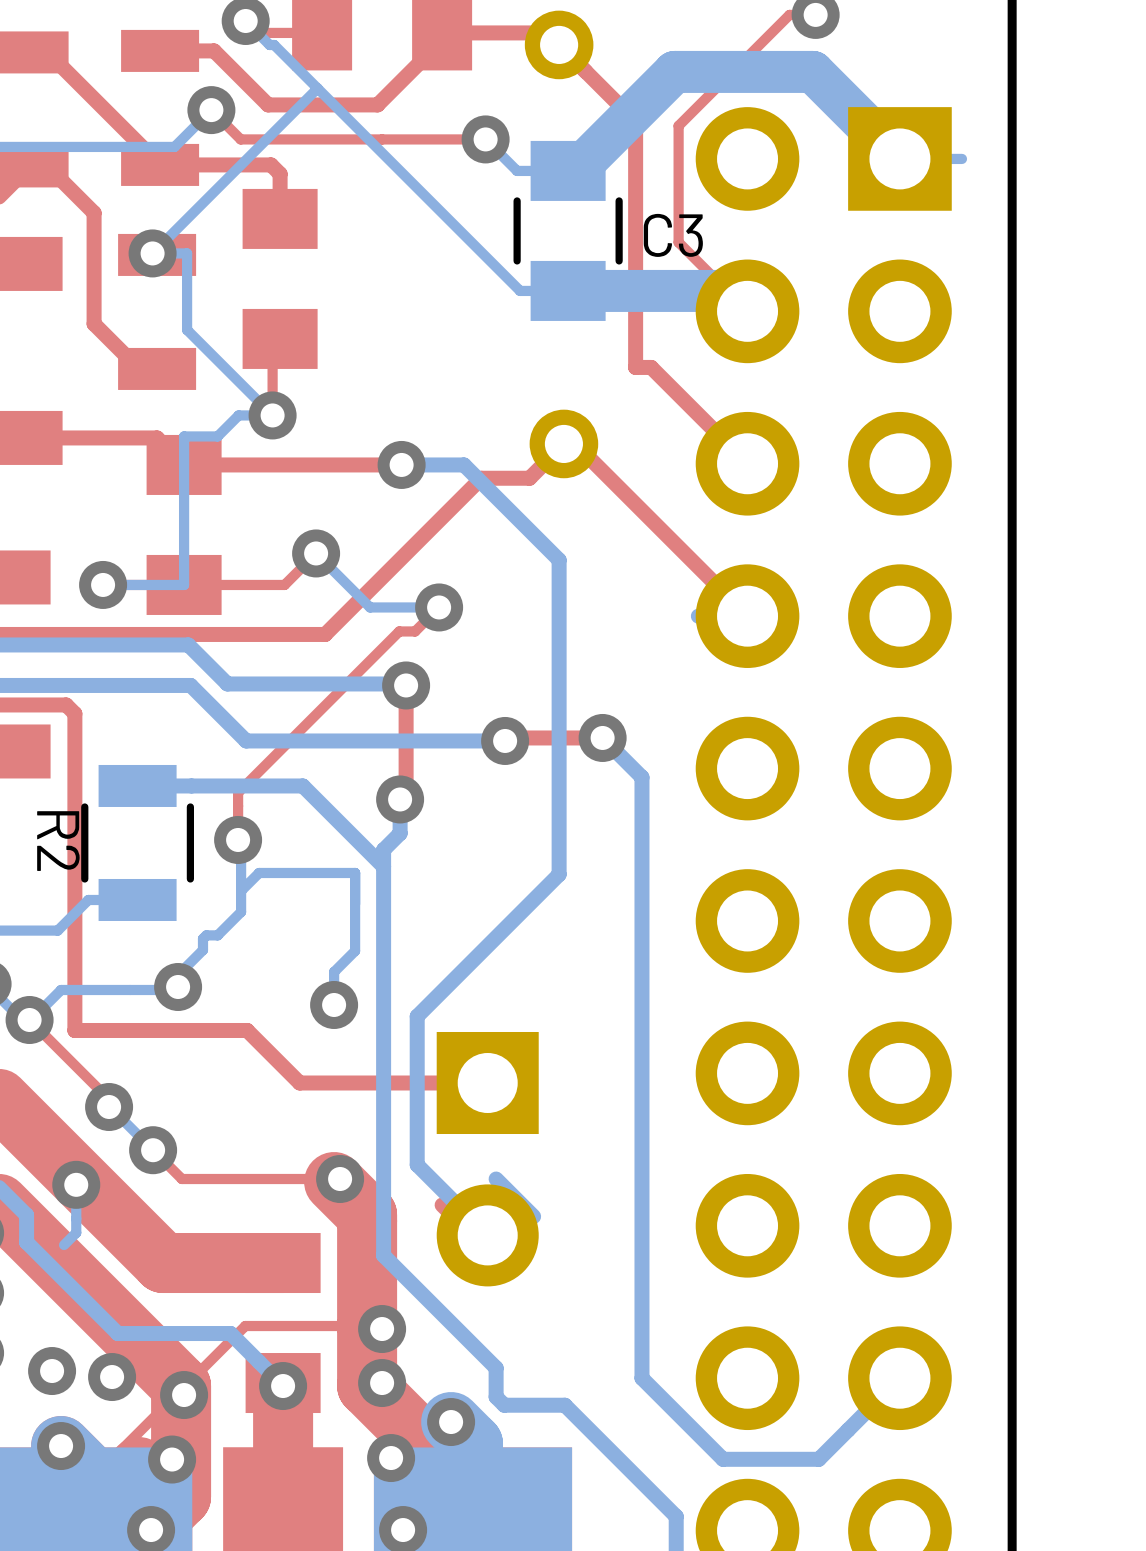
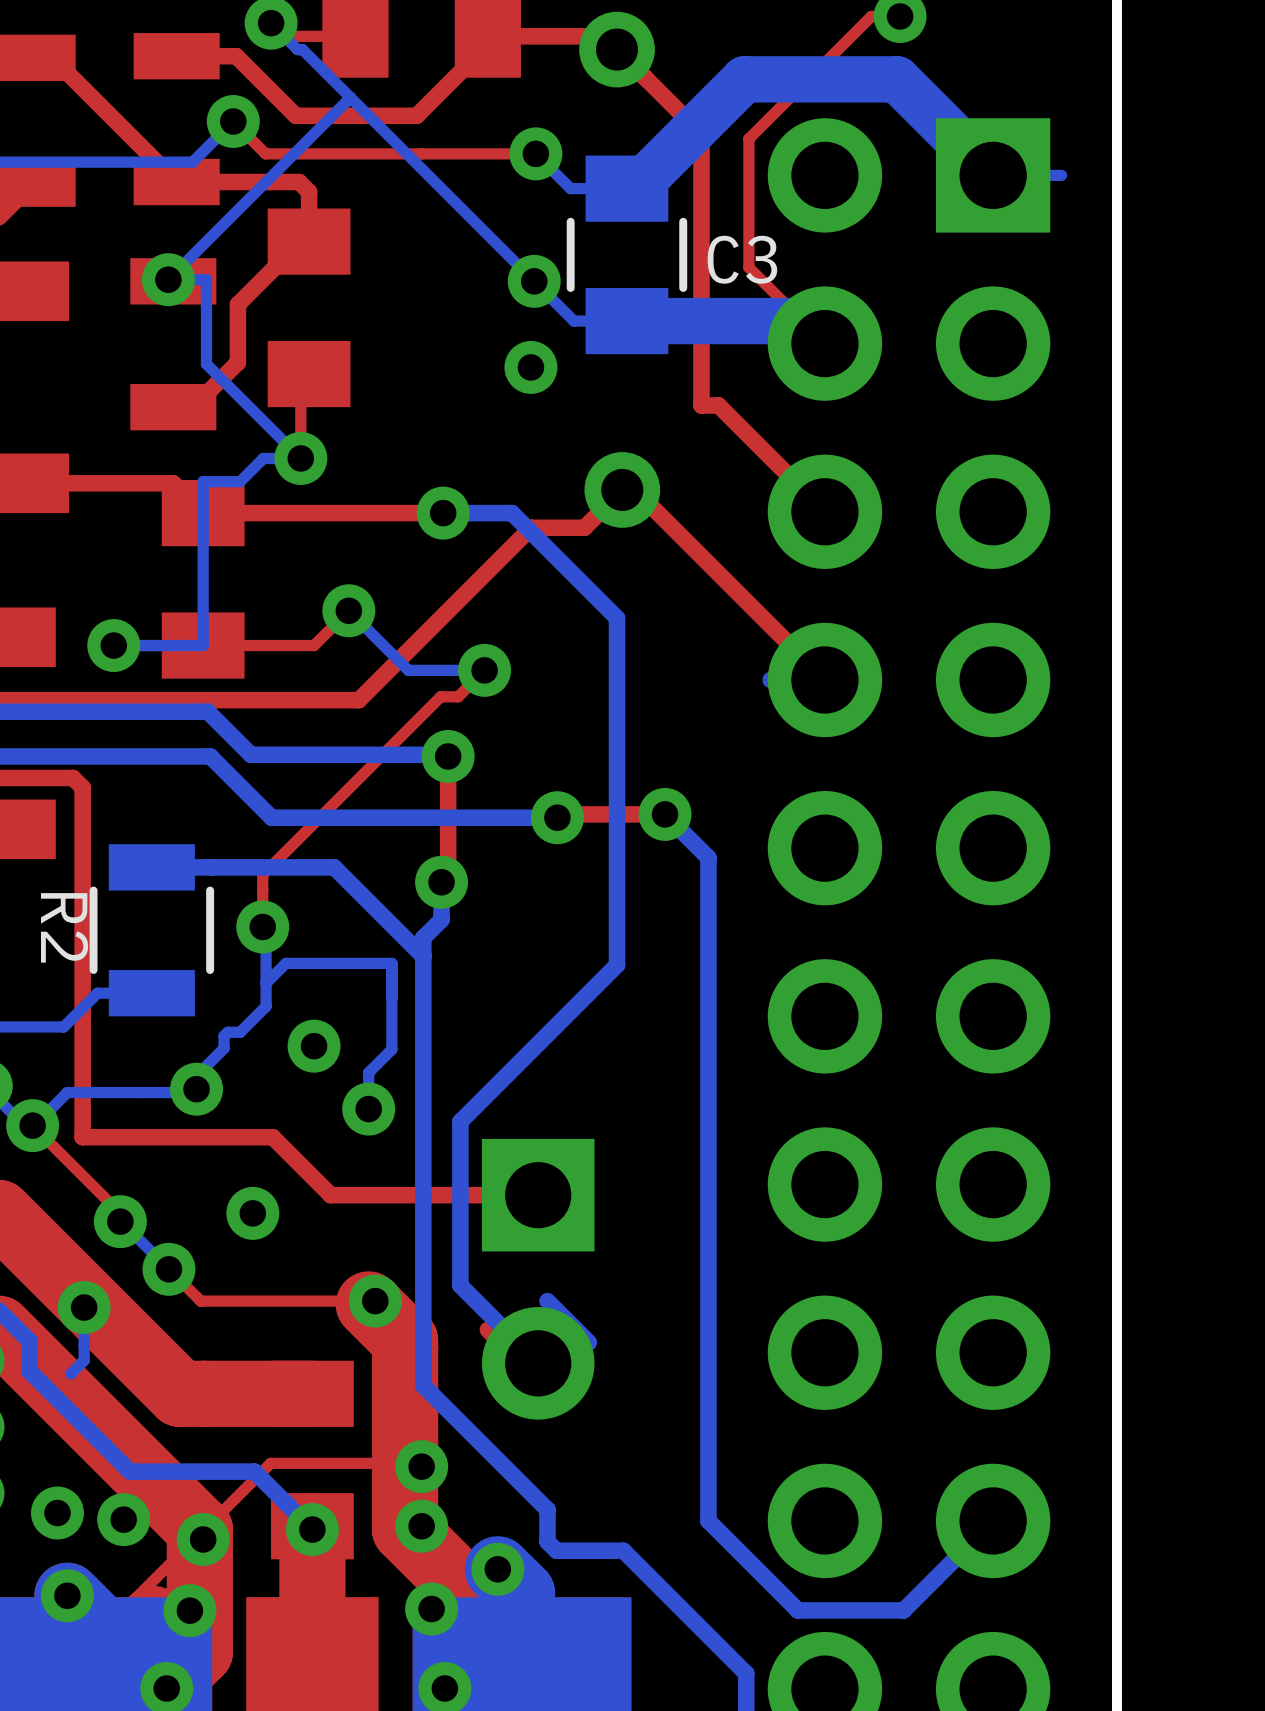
top track: (47, 166) (94, 212) (94, 323) (139, 368) -> none
top track: none -> (309, 241) (300, 241) (237, 304) (237, 362) (193, 407) (173, 407)
via: none -> (534, 281)
via: none -> (530, 367)
via: none -> (314, 1046)
via: none -> (252, 1213)

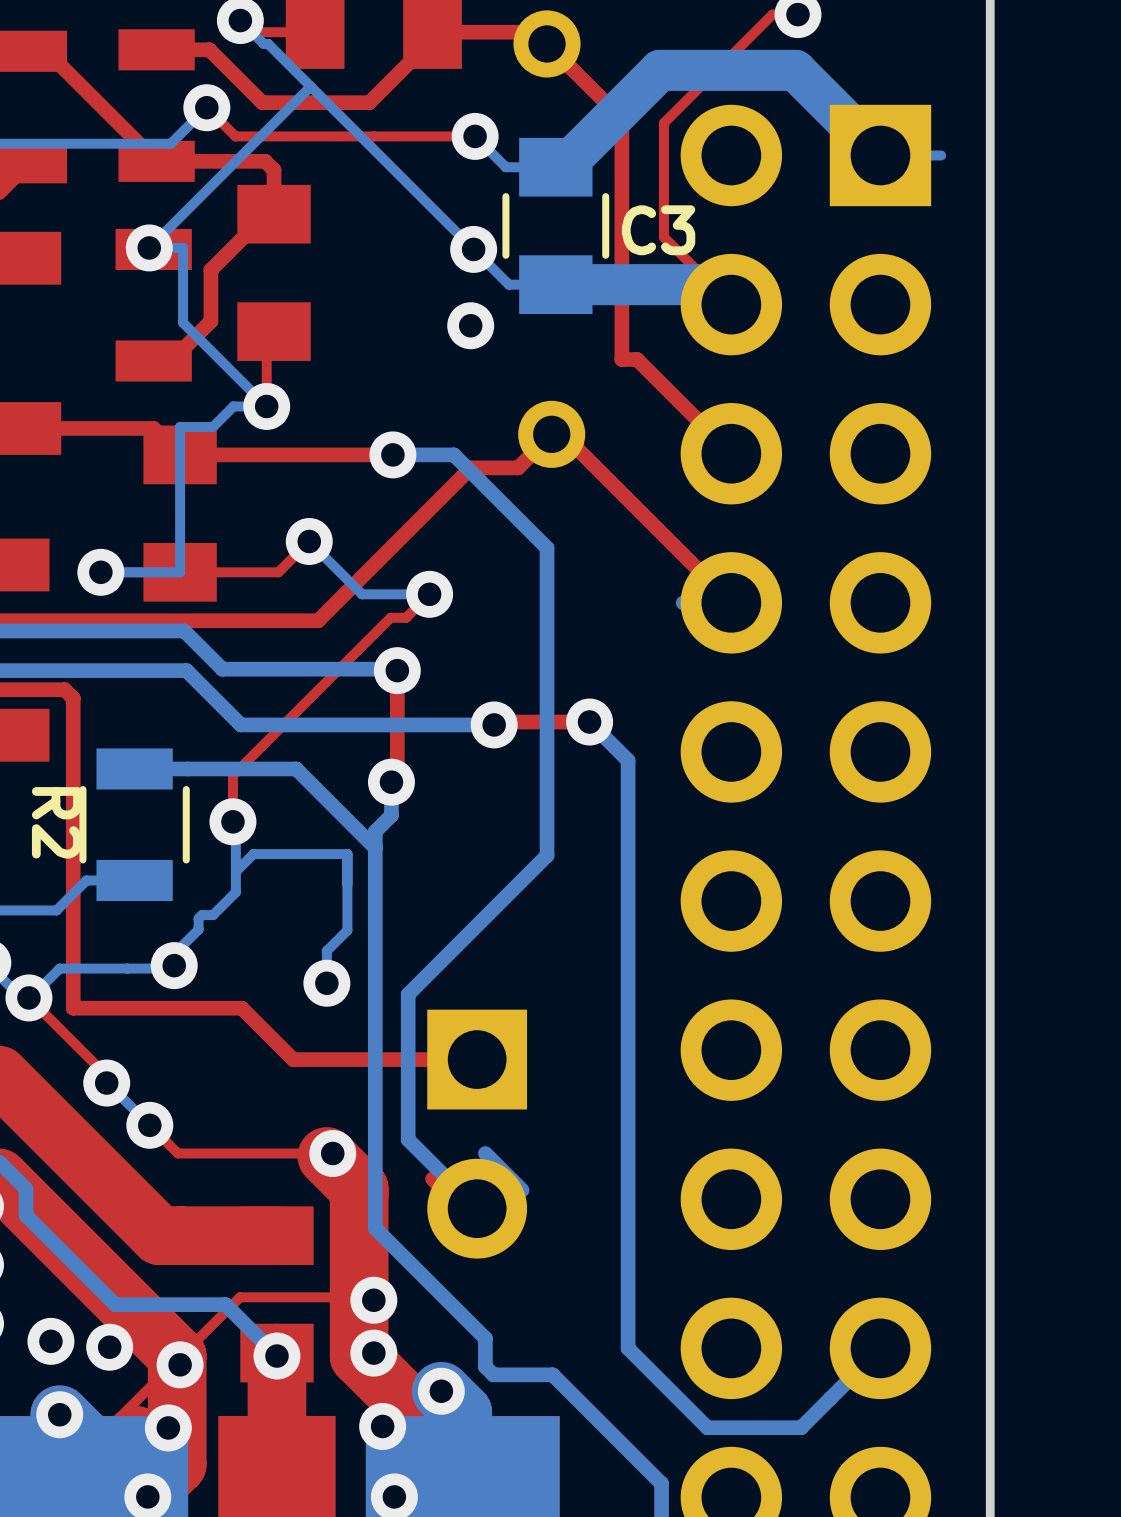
via: (314, 1046) -> none
via: (252, 1213) -> none
bottom track: (84, 1307) (84, 1360) (70, 1373) -> none
via: (84, 1307) -> none

